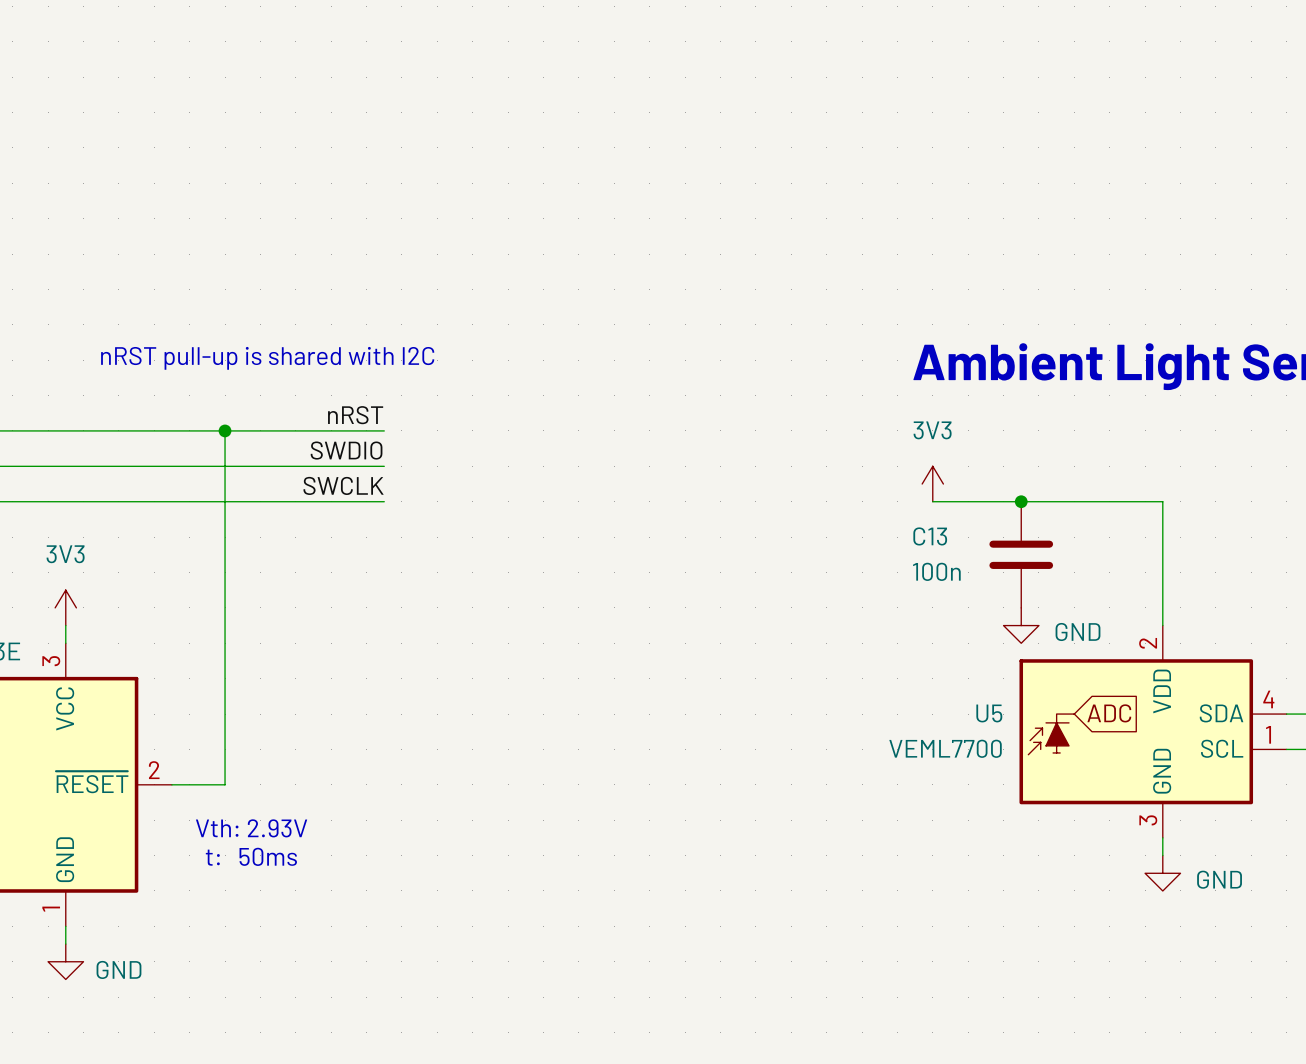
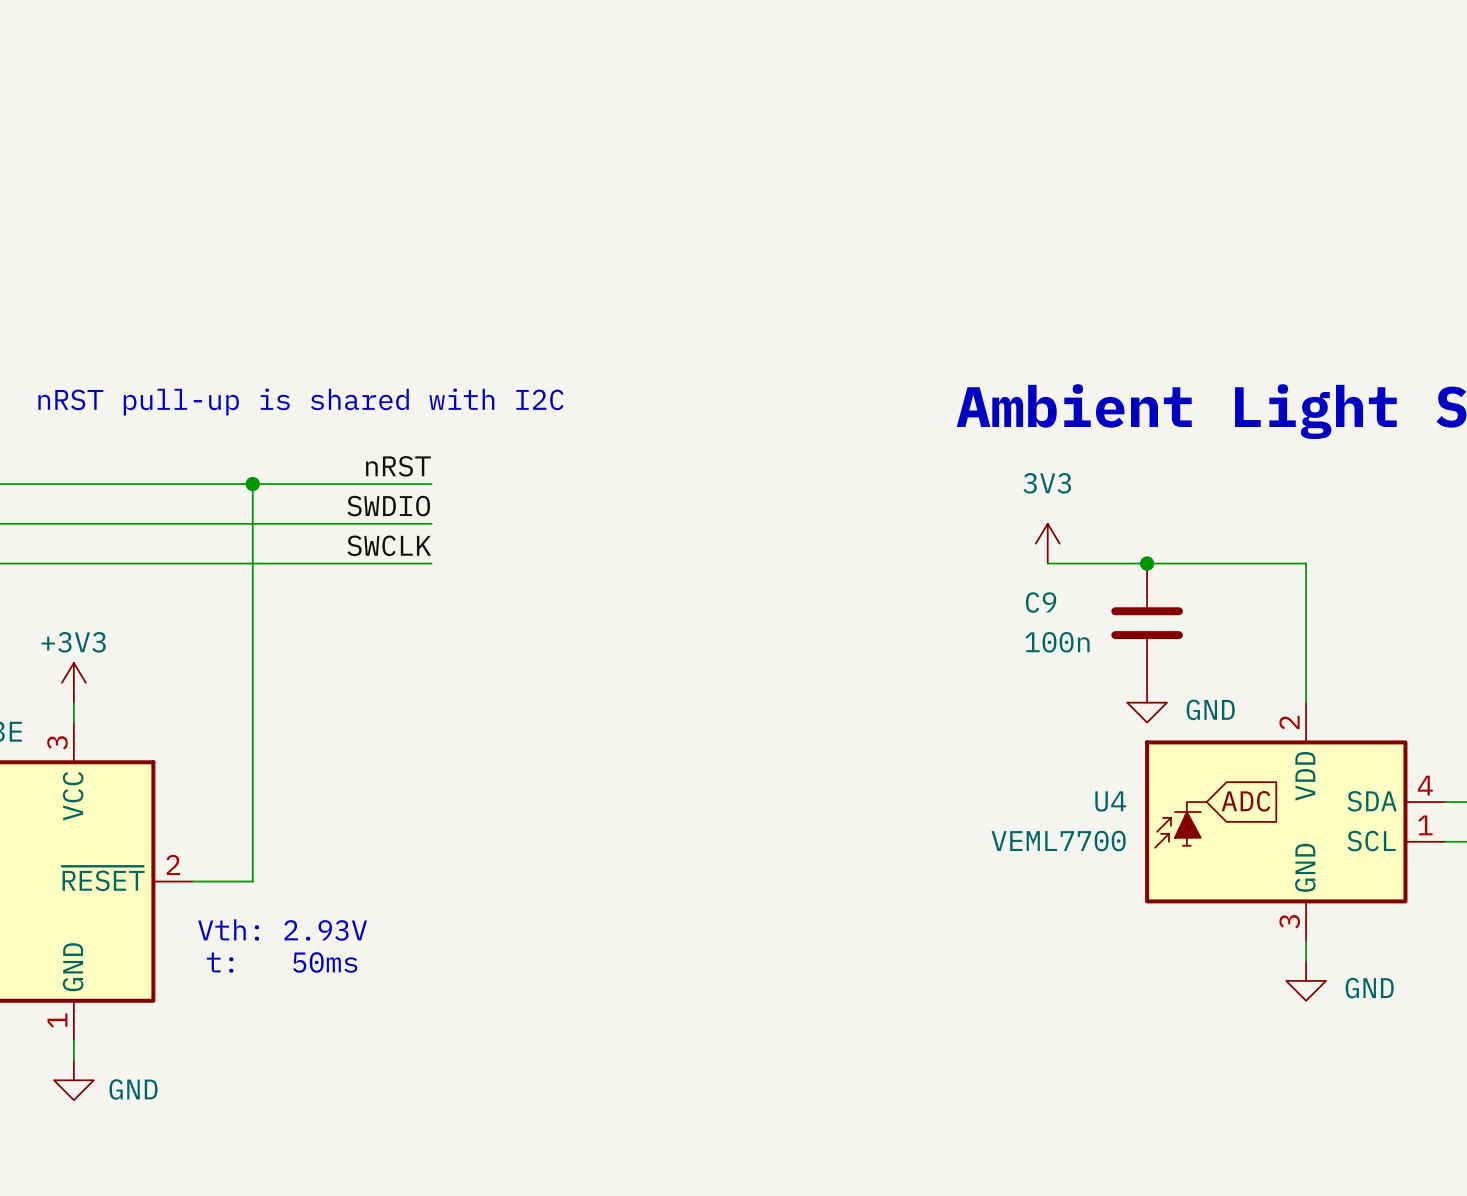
C13 name: C13 (930, 536) -> C9 (1041, 602)
power symbol: 3V3 (65, 607) -> +3V3 (73, 682)
U5 name: U5 (989, 713) -> U4 (1110, 801)

